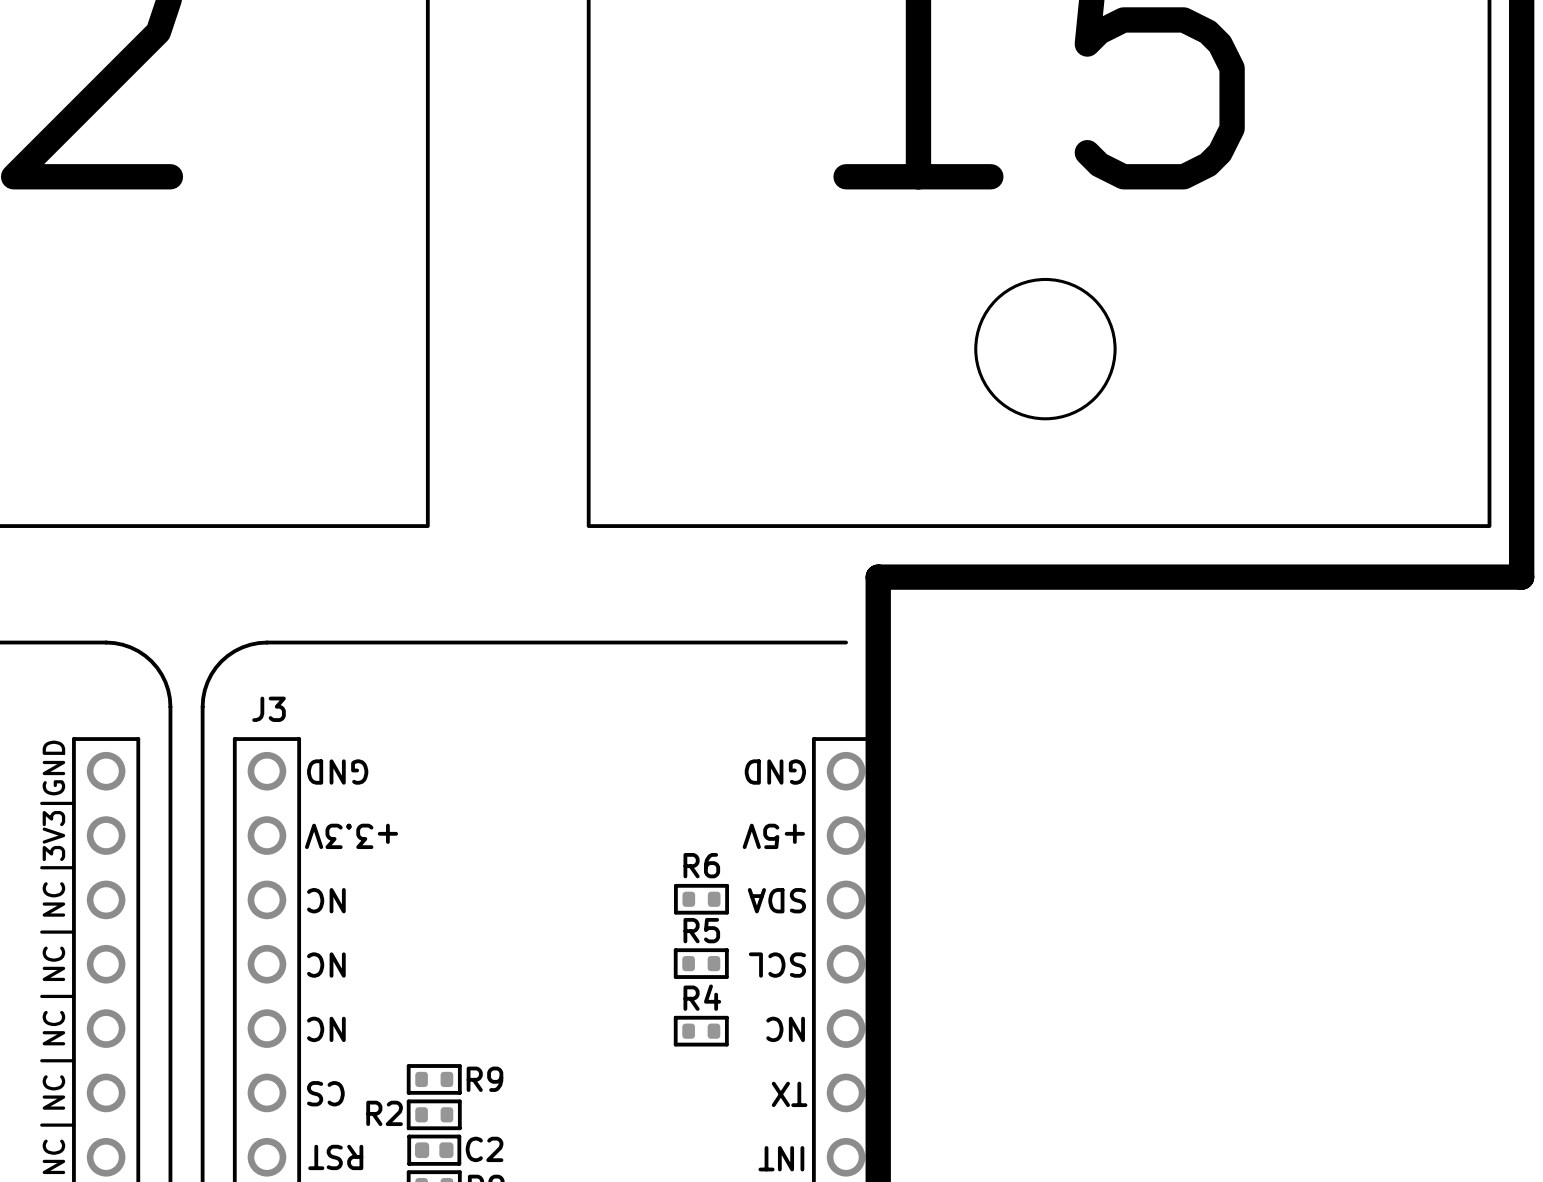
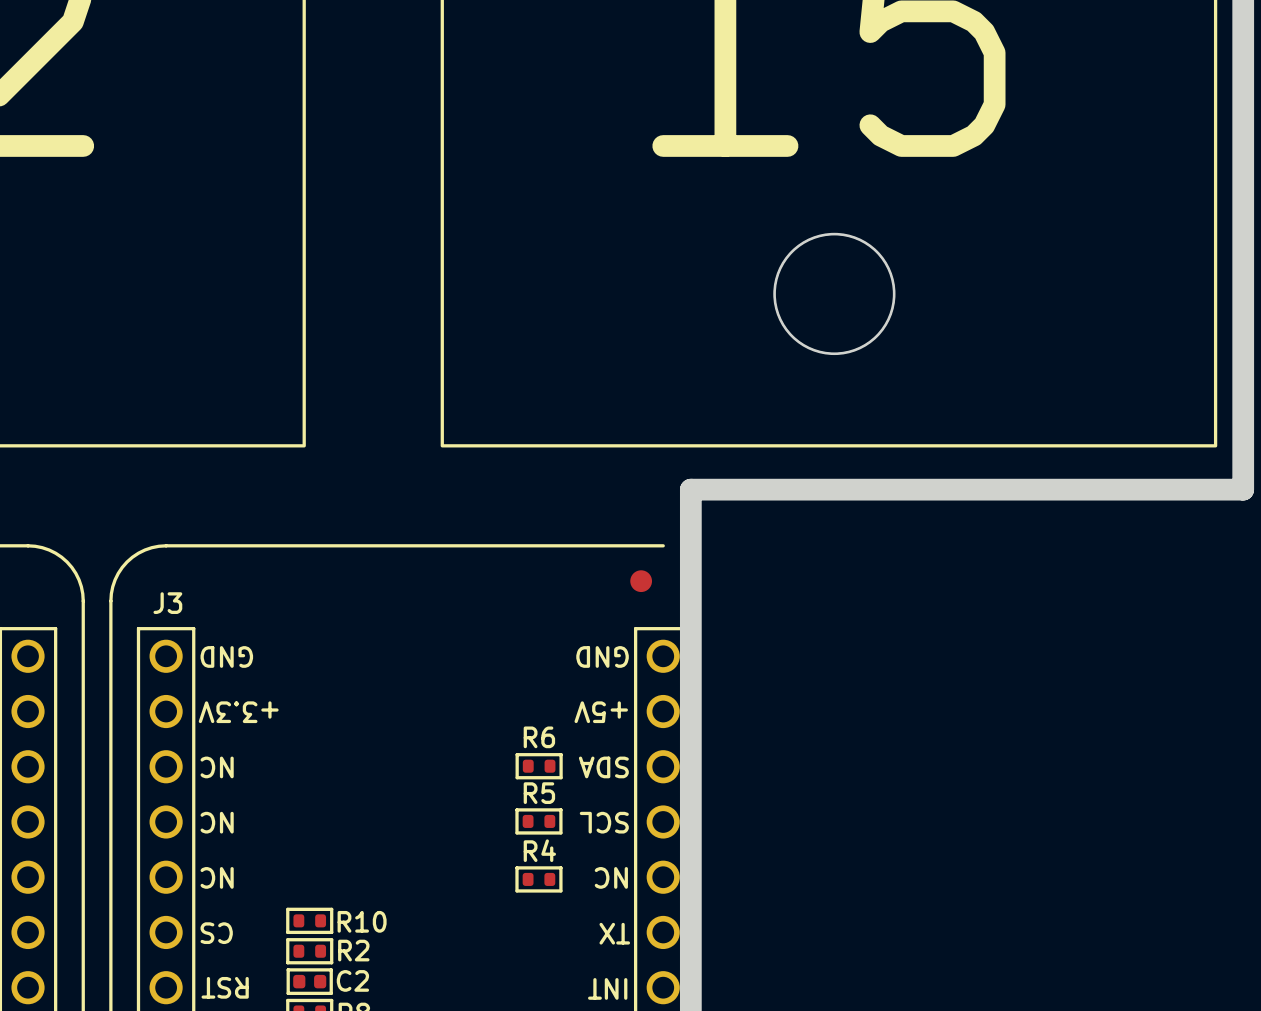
part: none -> (641, 581)
R9 name: R9 (484, 1079) -> R10 (362, 921)
R2 name position: R2 (384, 1113) -> R2 (353, 950)

